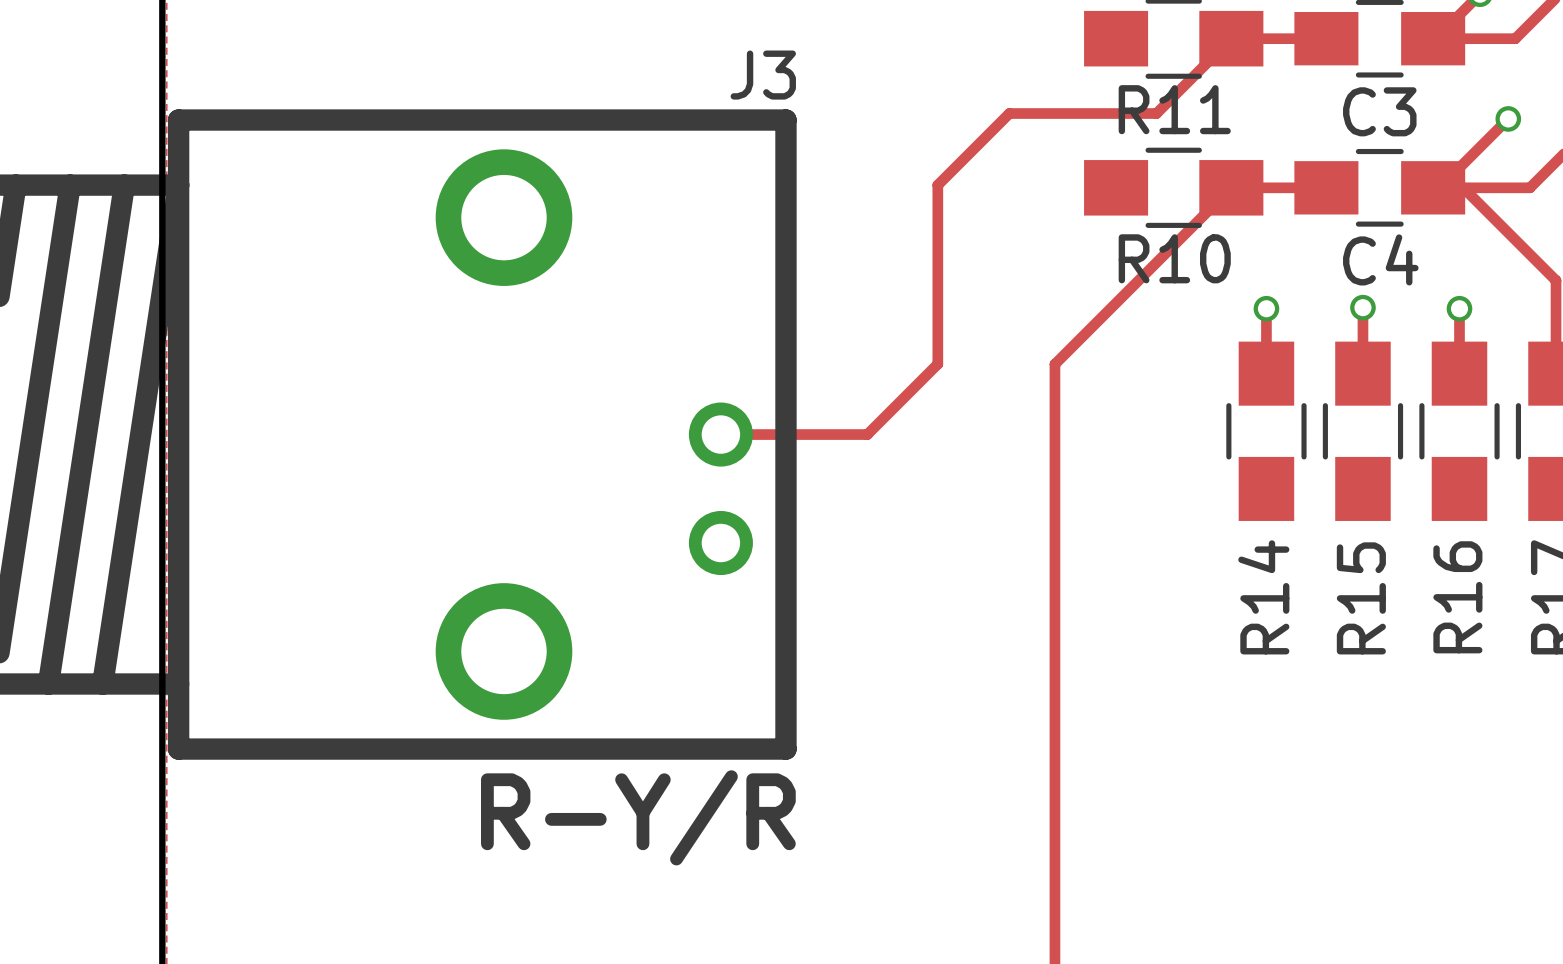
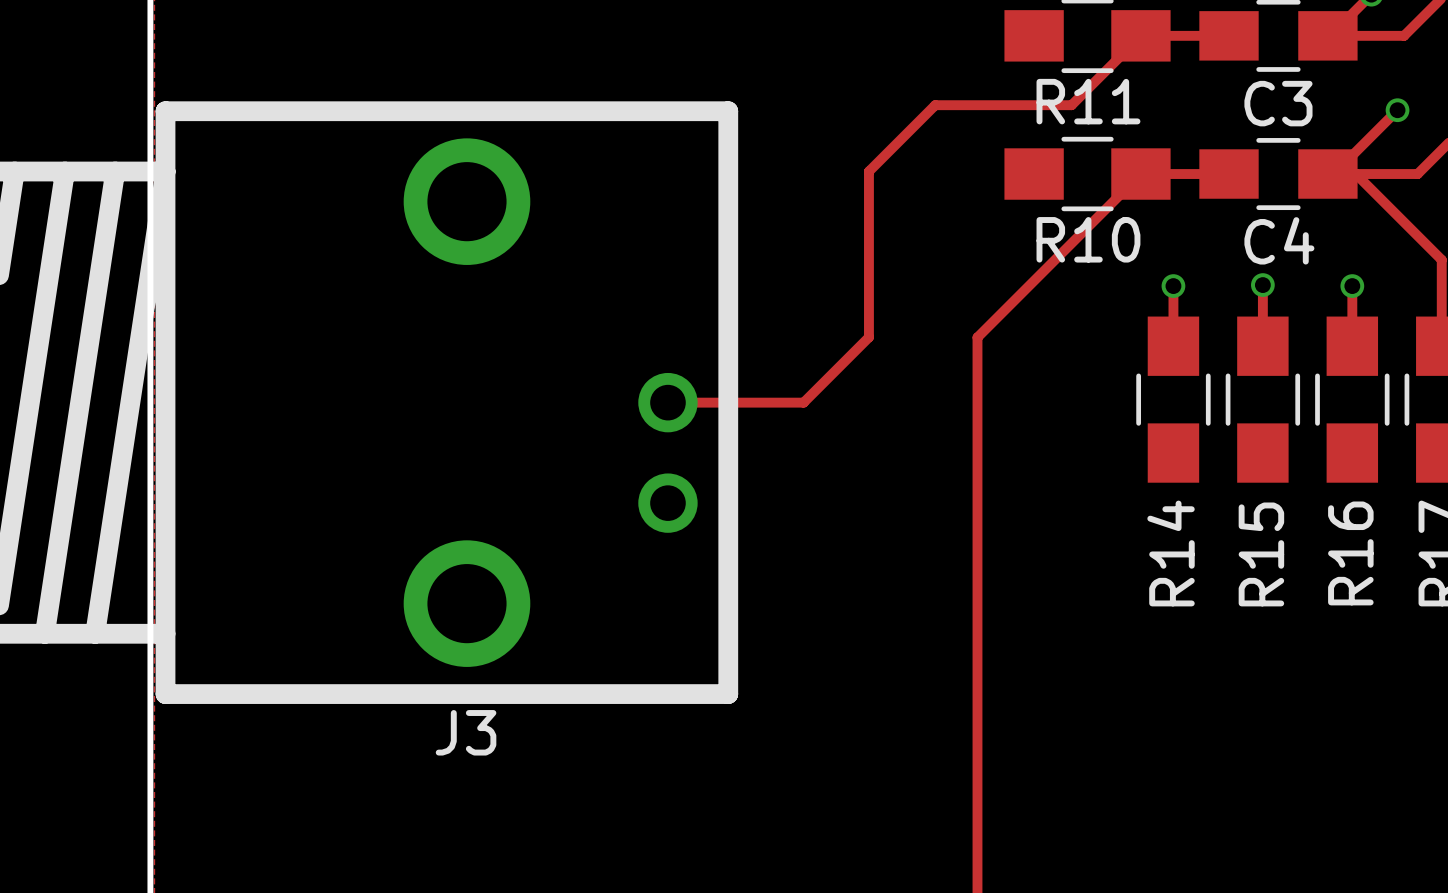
J3 name position: J3 (763, 75) -> J3 (466, 732)
text: R-Y/R (638, 817) -> none

